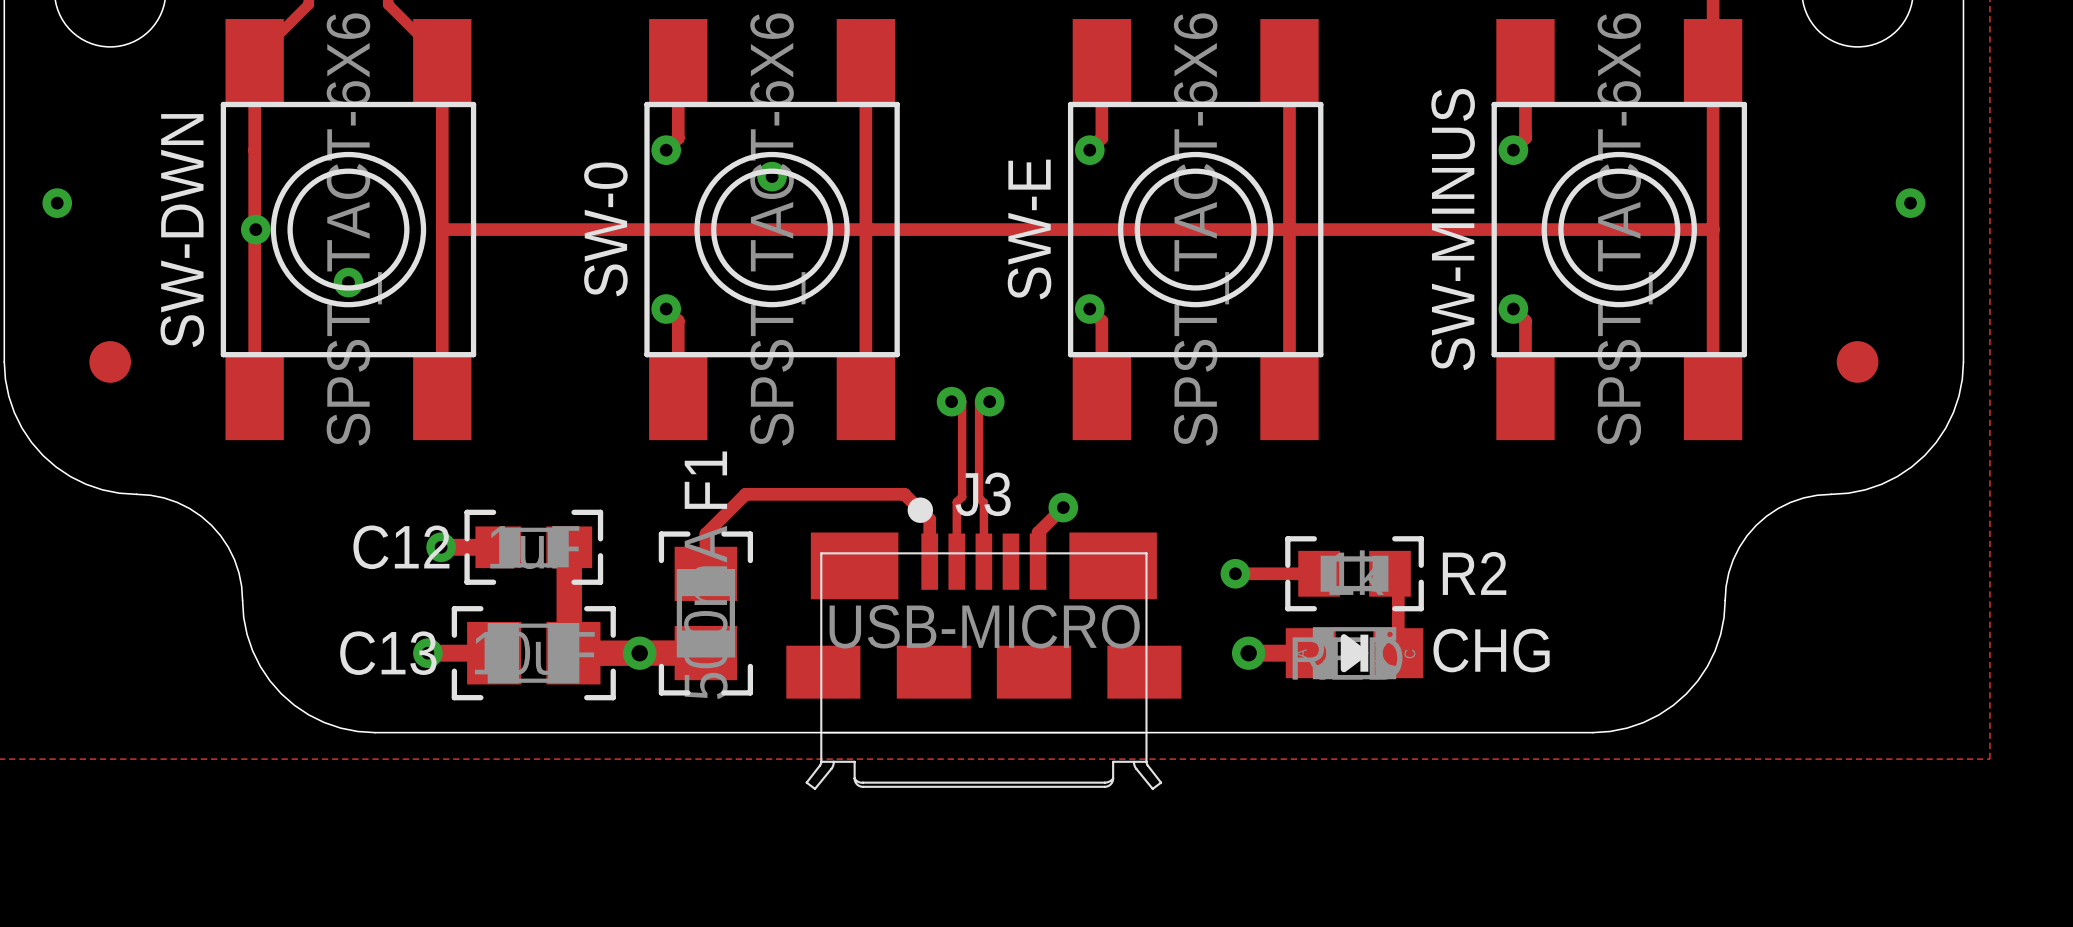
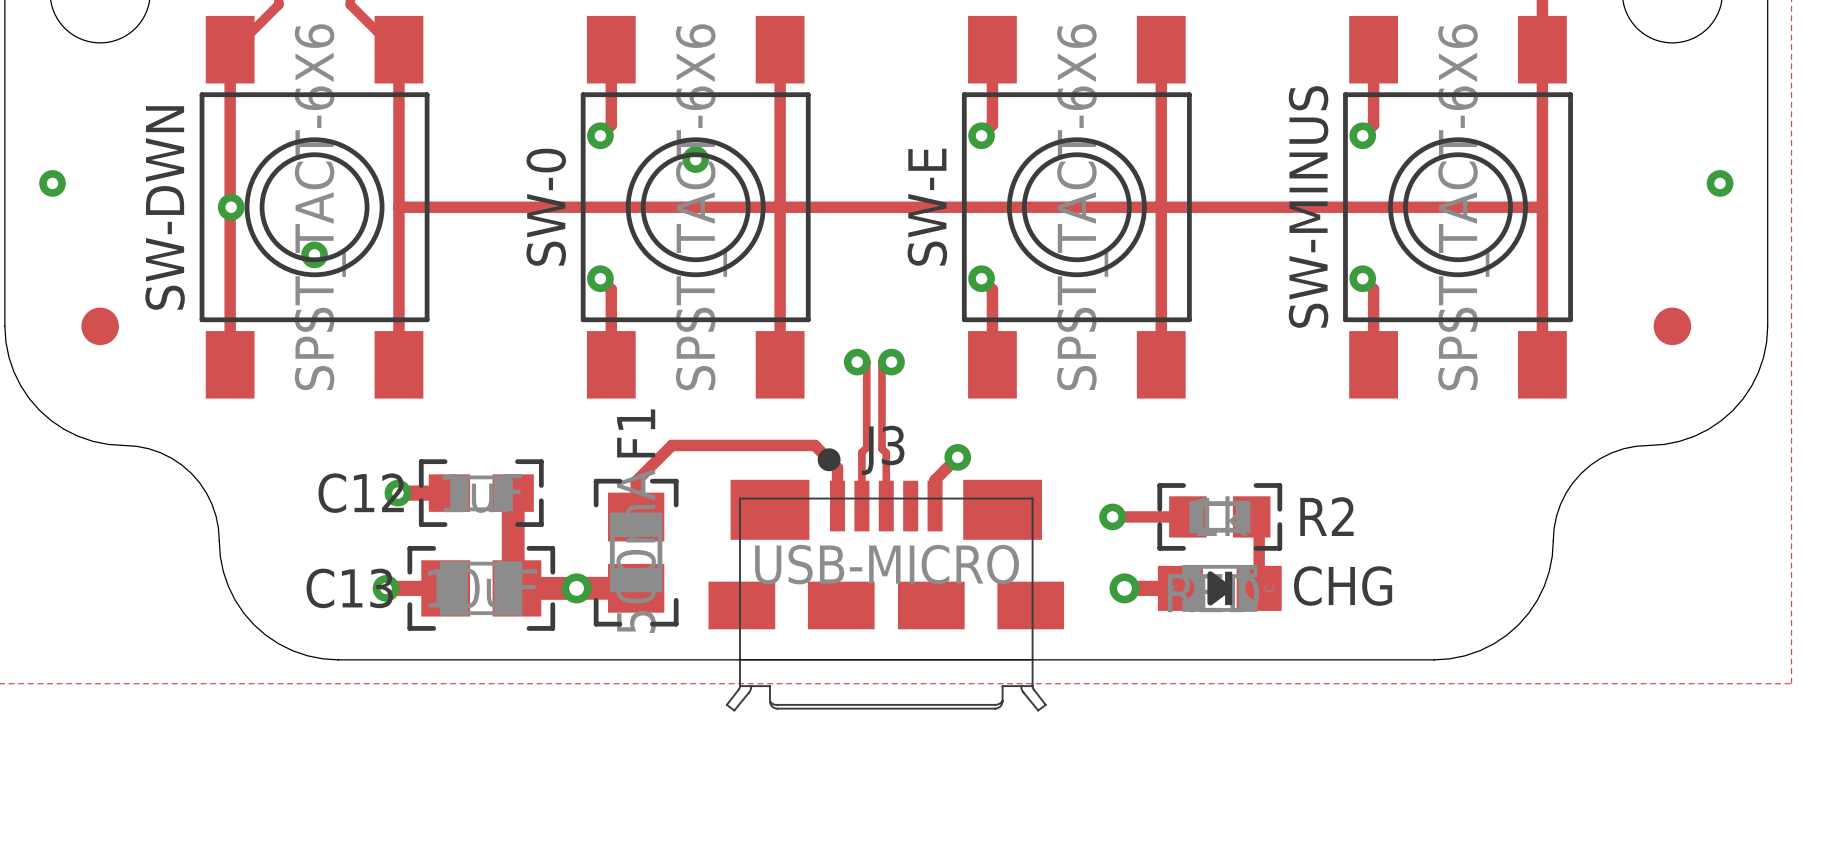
SW-DWN footprint: [220, 19, 477, 441] -> [199, 15, 430, 399]
SW-0 footprint: [644, 19, 900, 441] -> [580, 15, 811, 399]
SW-E footprint: [1067, 19, 1324, 441] -> [961, 15, 1192, 399]
SW-MINUS footprint: [1491, 19, 1748, 441] -> [1343, 15, 1573, 399]

